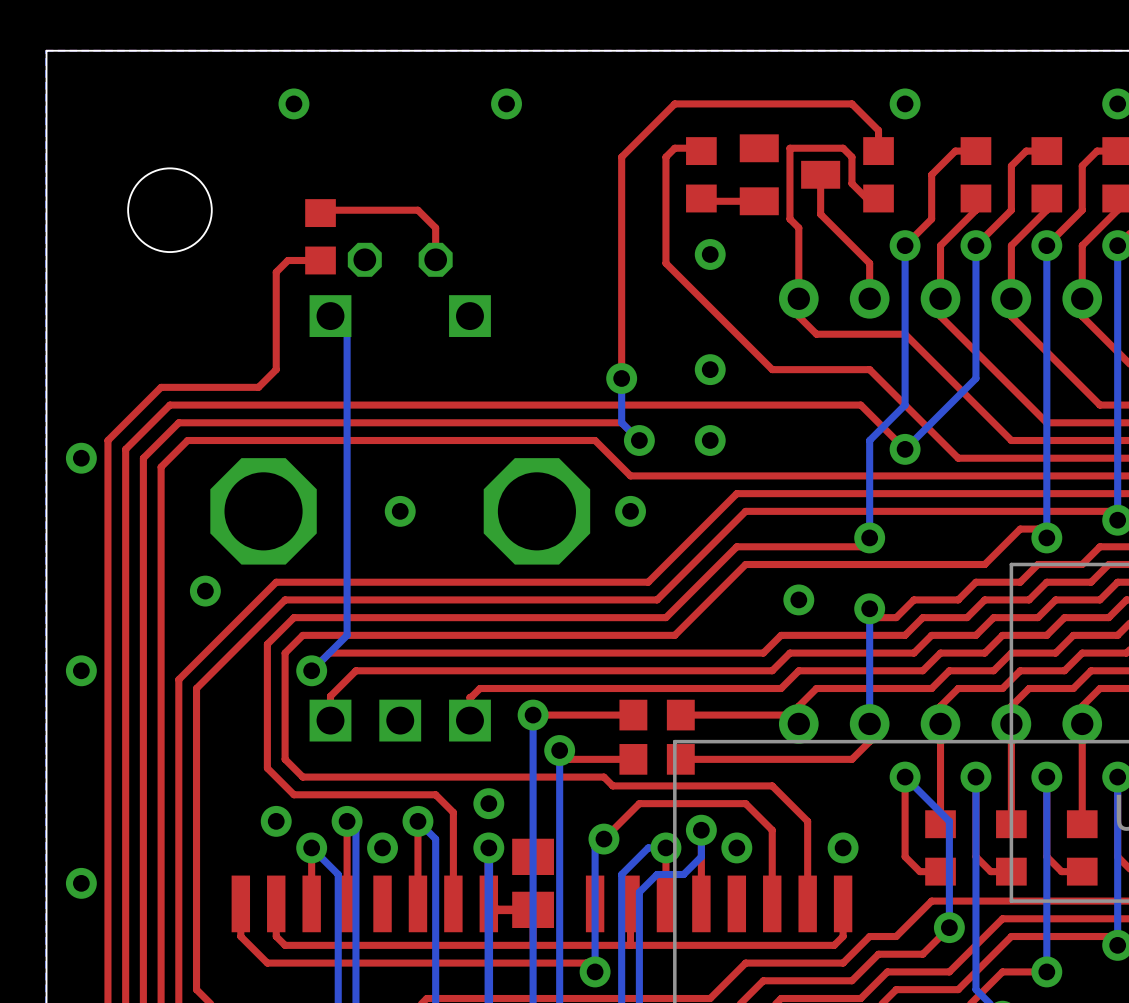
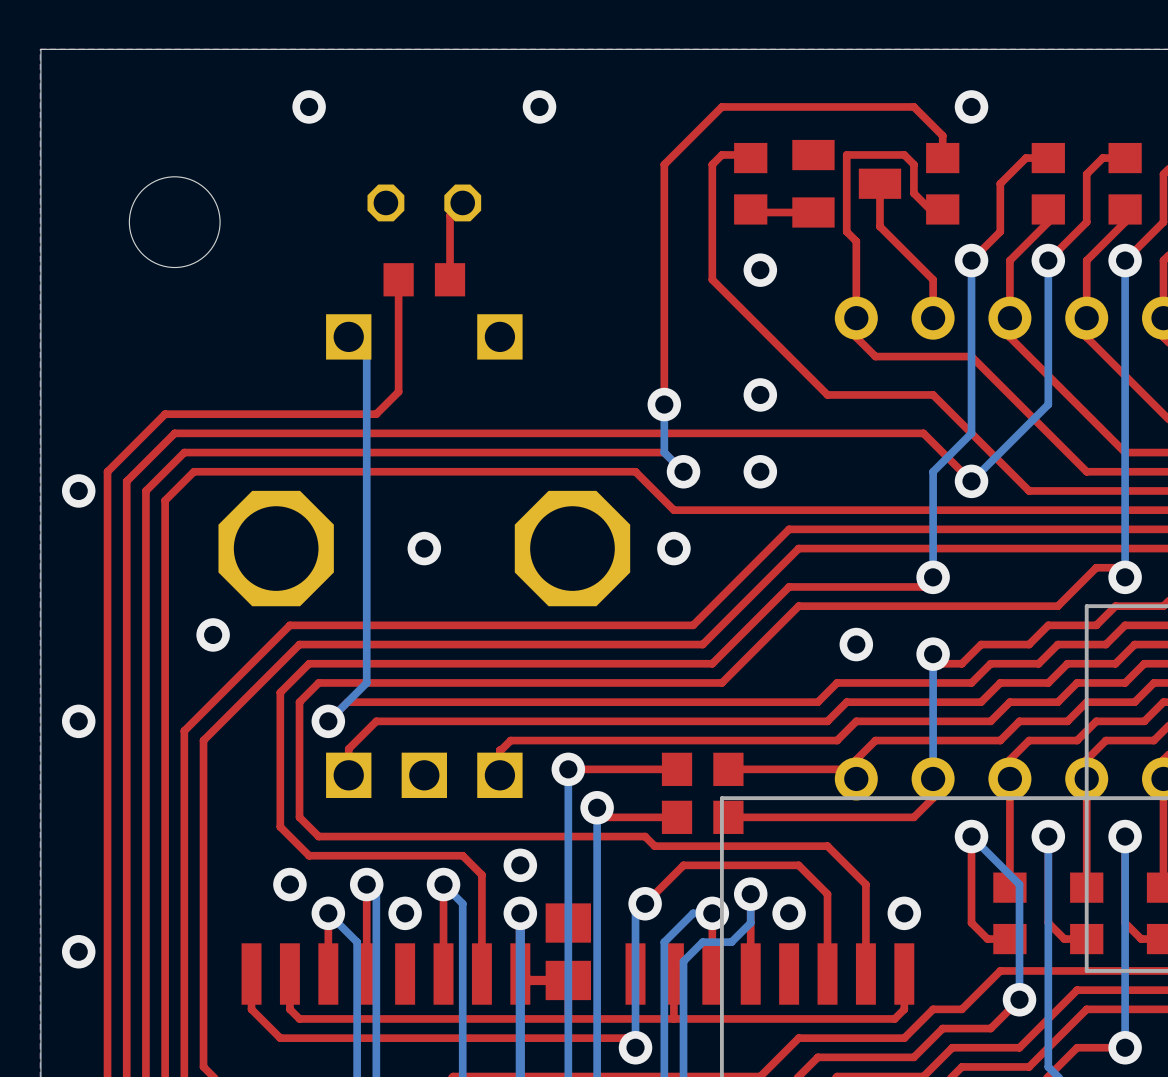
part: none -> (424, 202)
top track: none -> (462, 202) (450, 215) (450, 279)
top track: (320, 213) (323, 210) (417, 210) (435, 227) (435, 259) -> none
part: (320, 236) -> none
part footprint: [347, 242, 453, 277] -> [383, 263, 466, 297]
top track: (320, 260) (287, 260) (276, 272) (276, 369) (258, 387) -> (398, 279) (398, 391) (376, 414) (270, 414)

